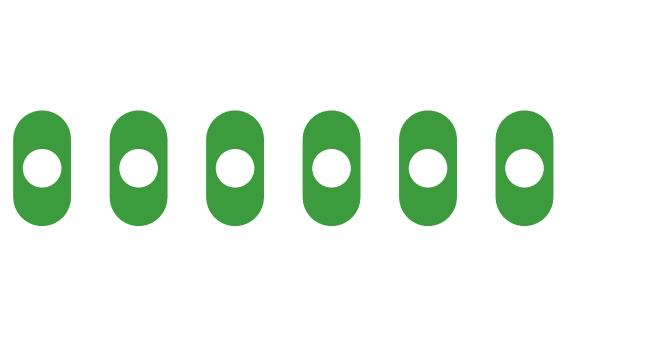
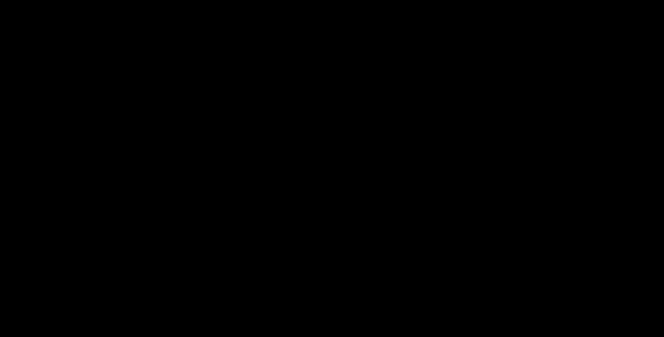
part: (283, 168) -> none

